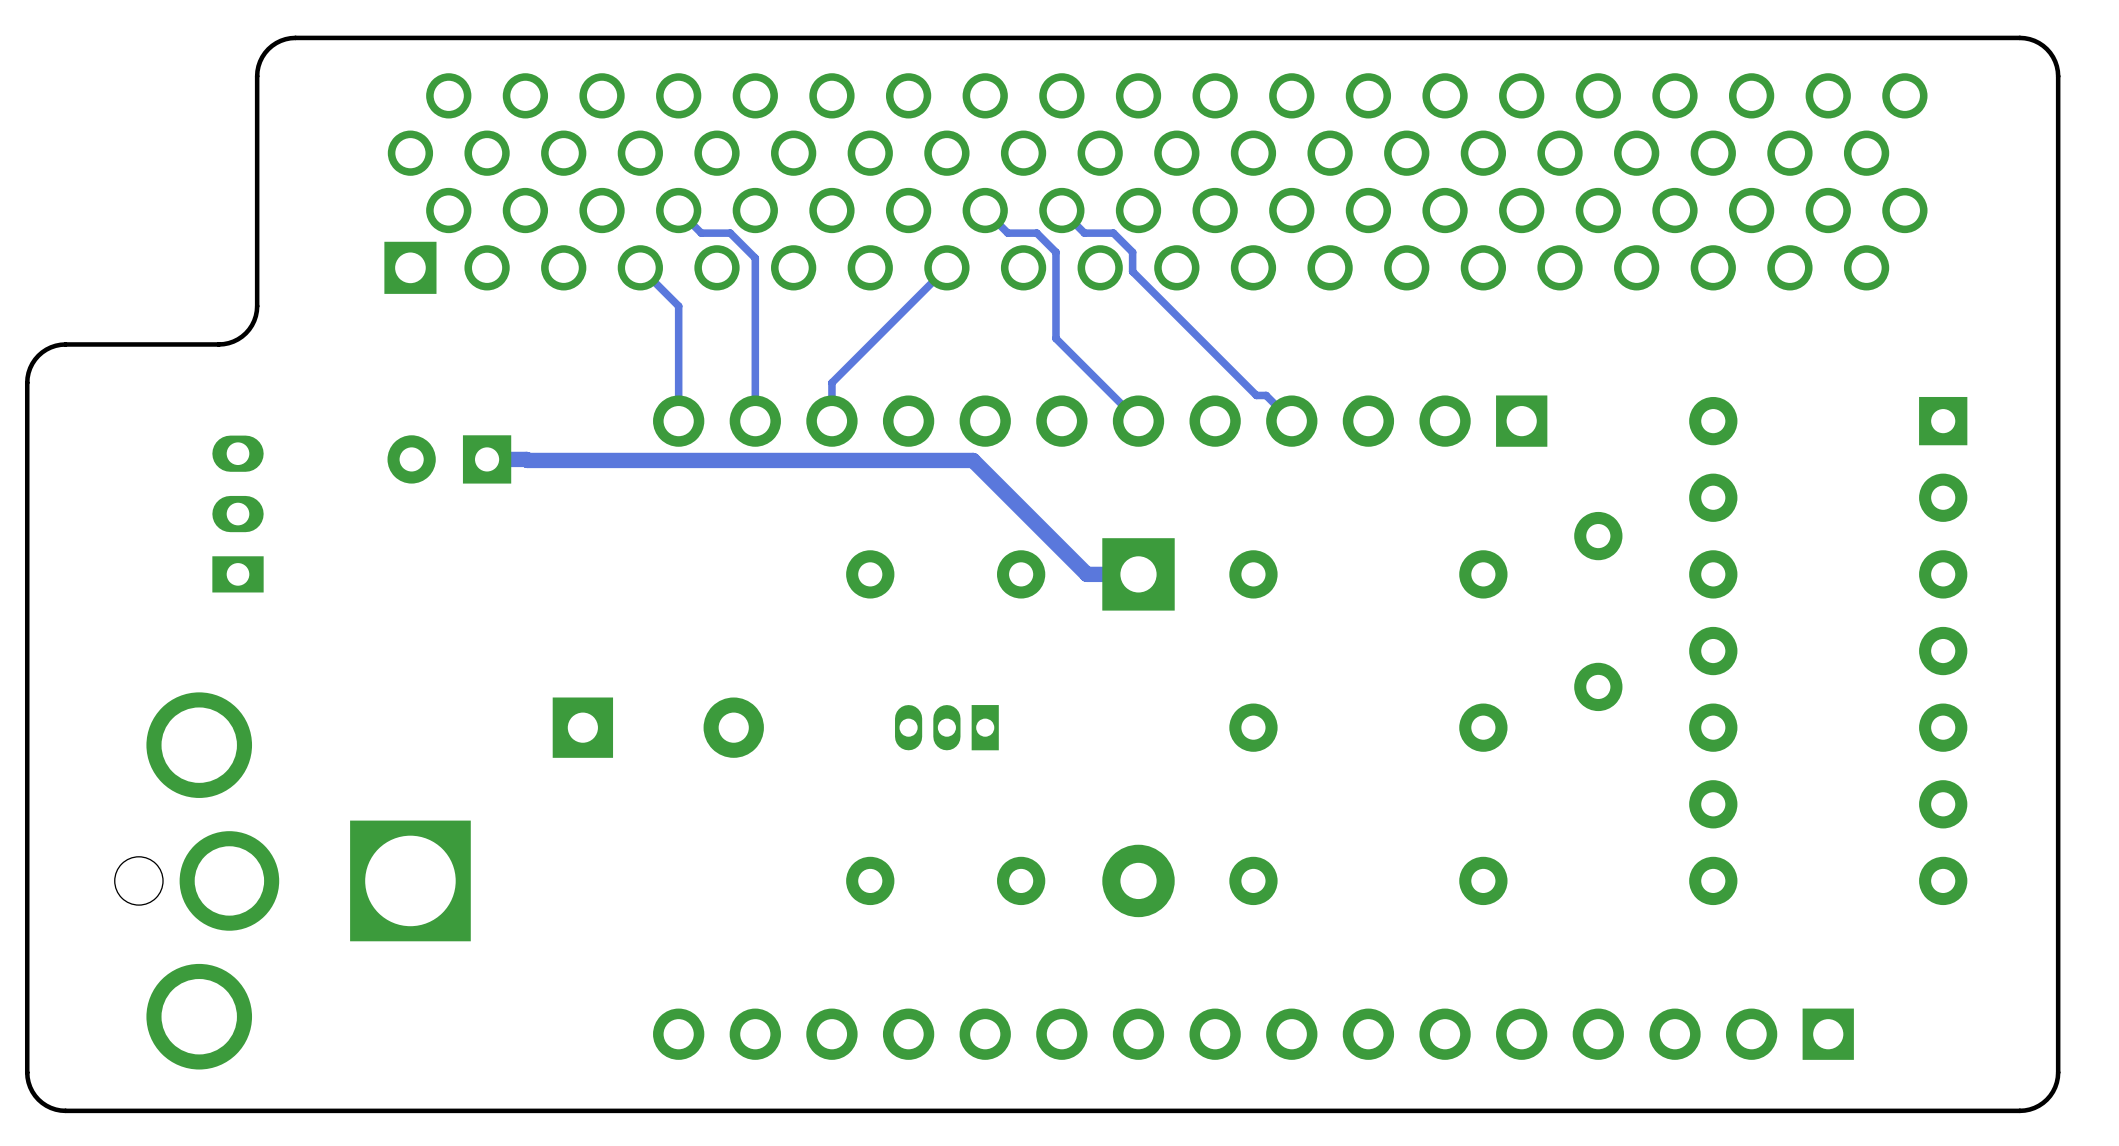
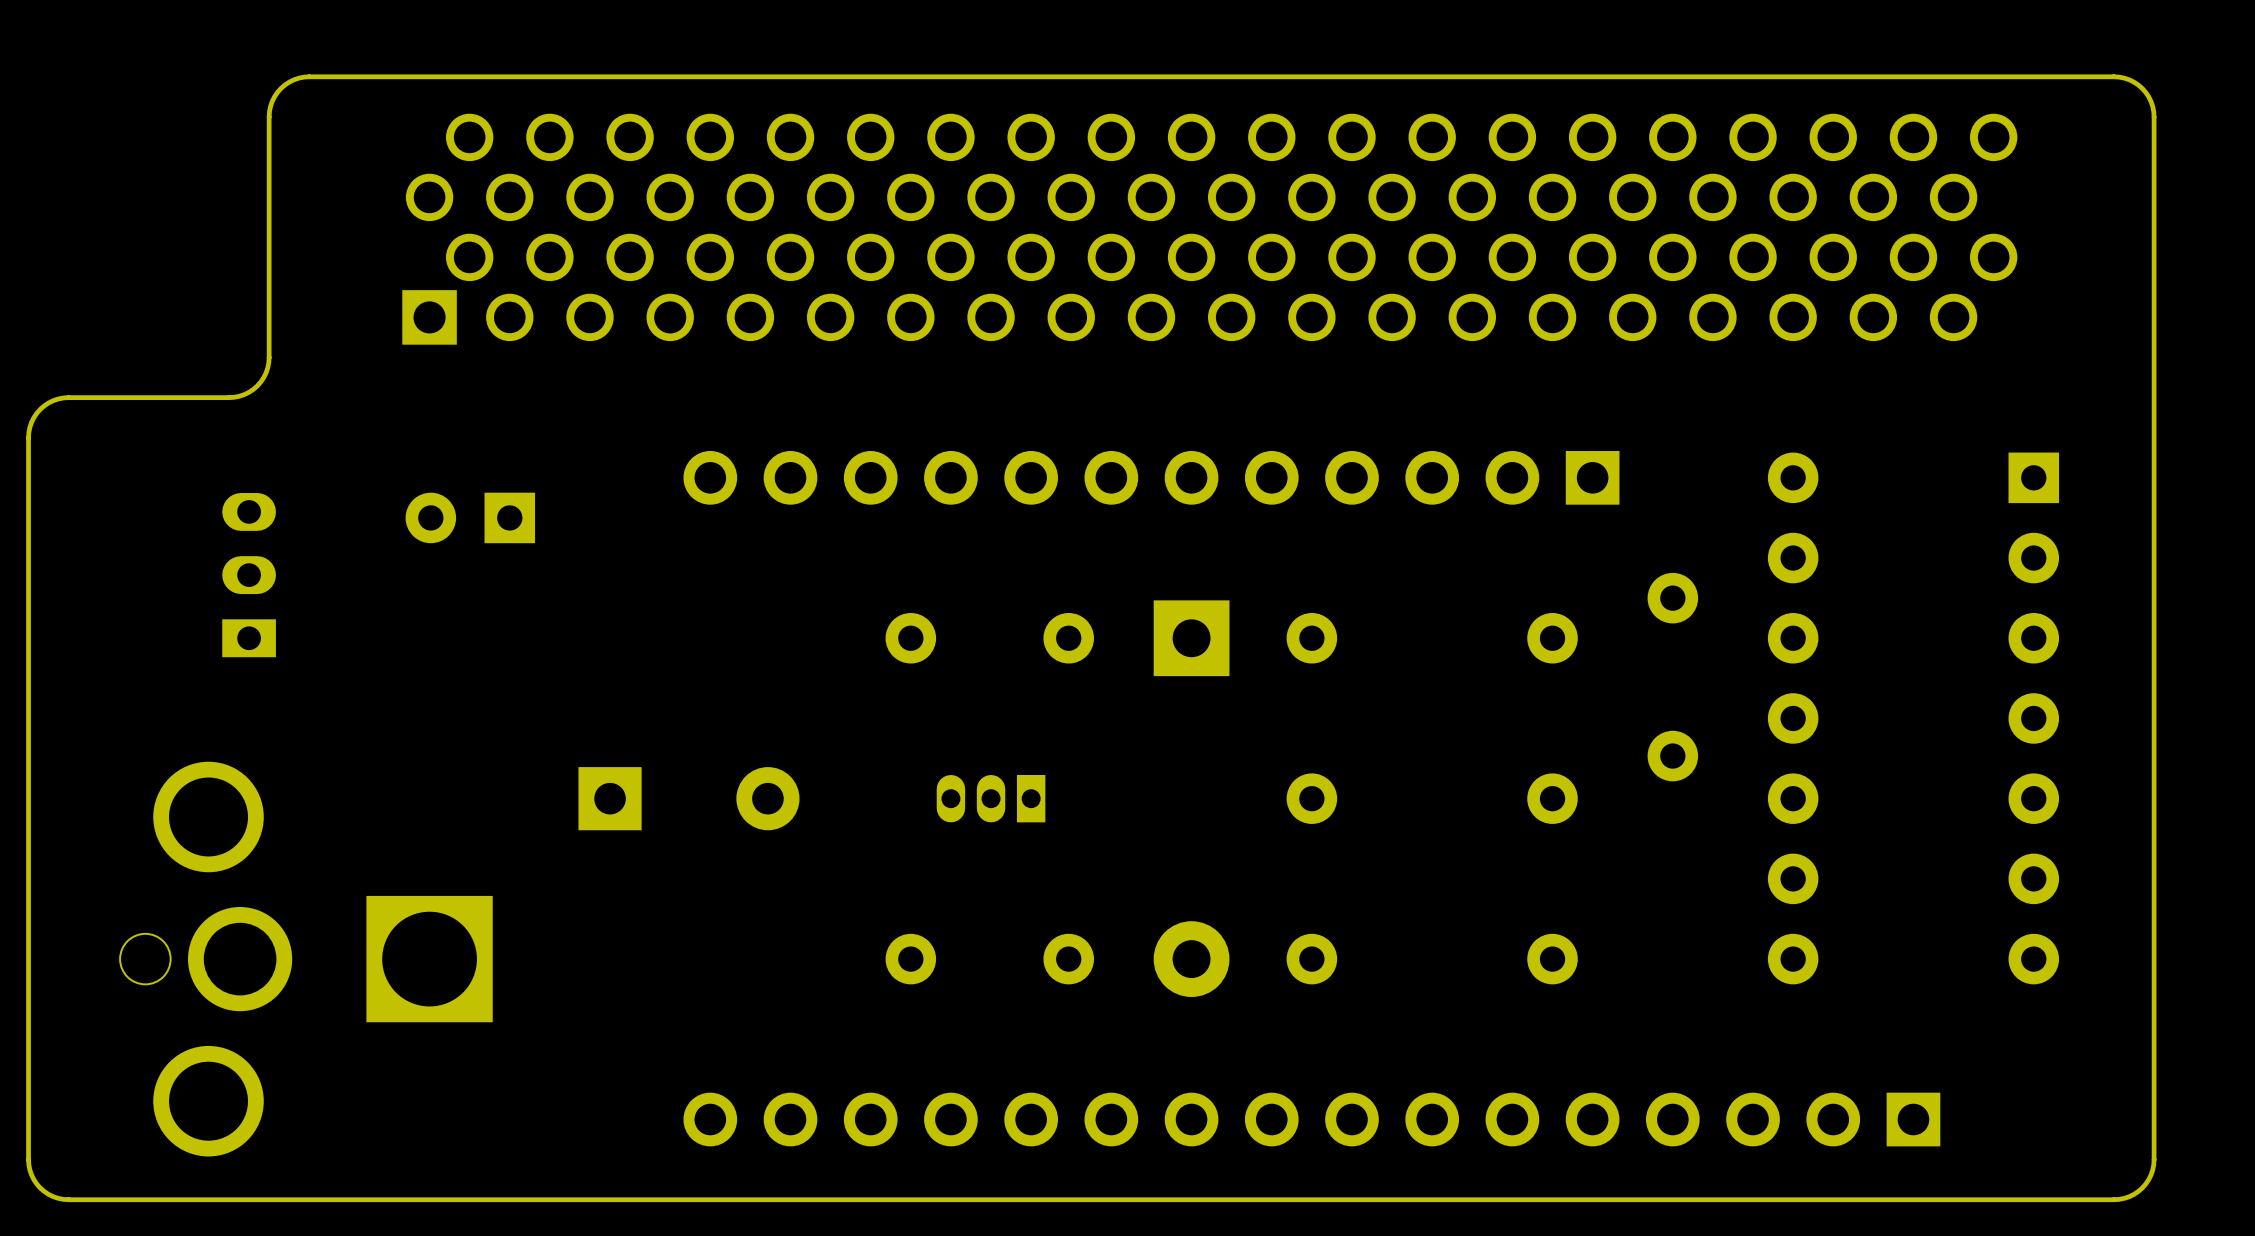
track: (678, 210) (701, 233) (730, 233) (755, 258) (755, 421) -> none
track: (985, 210) (1007, 233) (1036, 233) (1055, 252) (1055, 338) (1138, 421) -> none
track: (1061, 210) (1084, 233) (1113, 233) (1132, 252) (1132, 271) (1256, 395) (1266, 395) (1291, 421) -> none
track: (640, 267) (678, 306) (678, 421) -> none
track: (946, 267) (831, 382) (831, 421) -> none
track: (487, 459) (973, 460) (1086, 574) (1138, 574) -> none

